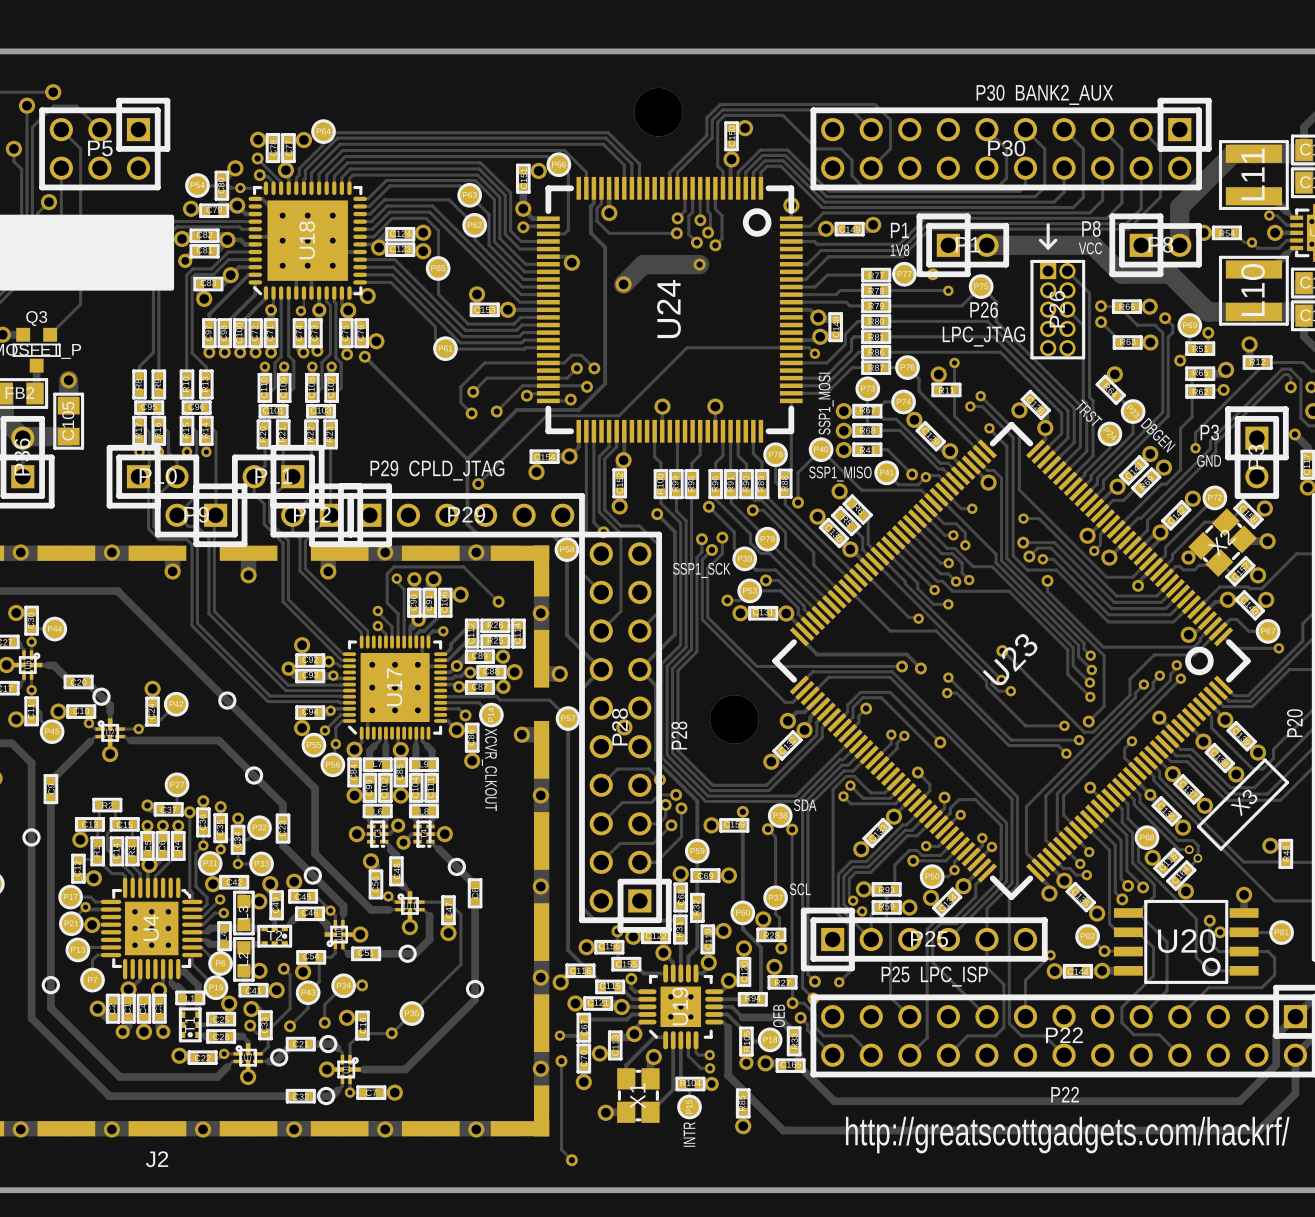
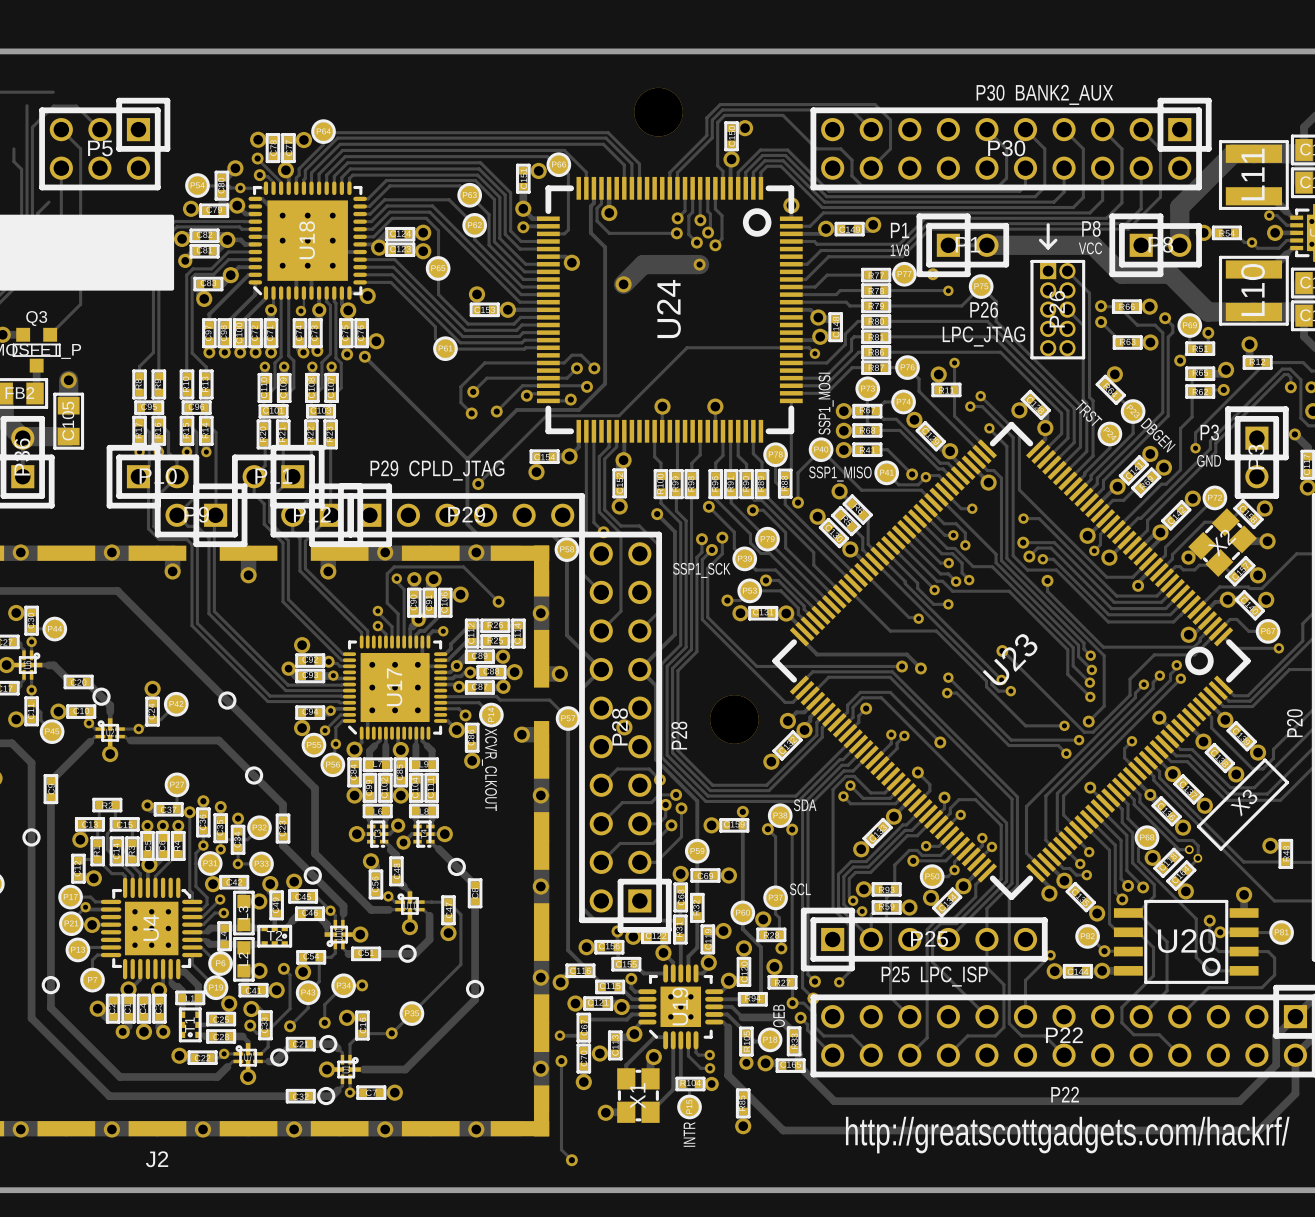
via: (53, 92) -> none
via: (27, 105) -> none
via: (13, 148) -> none
via: (49, 202) -> none

